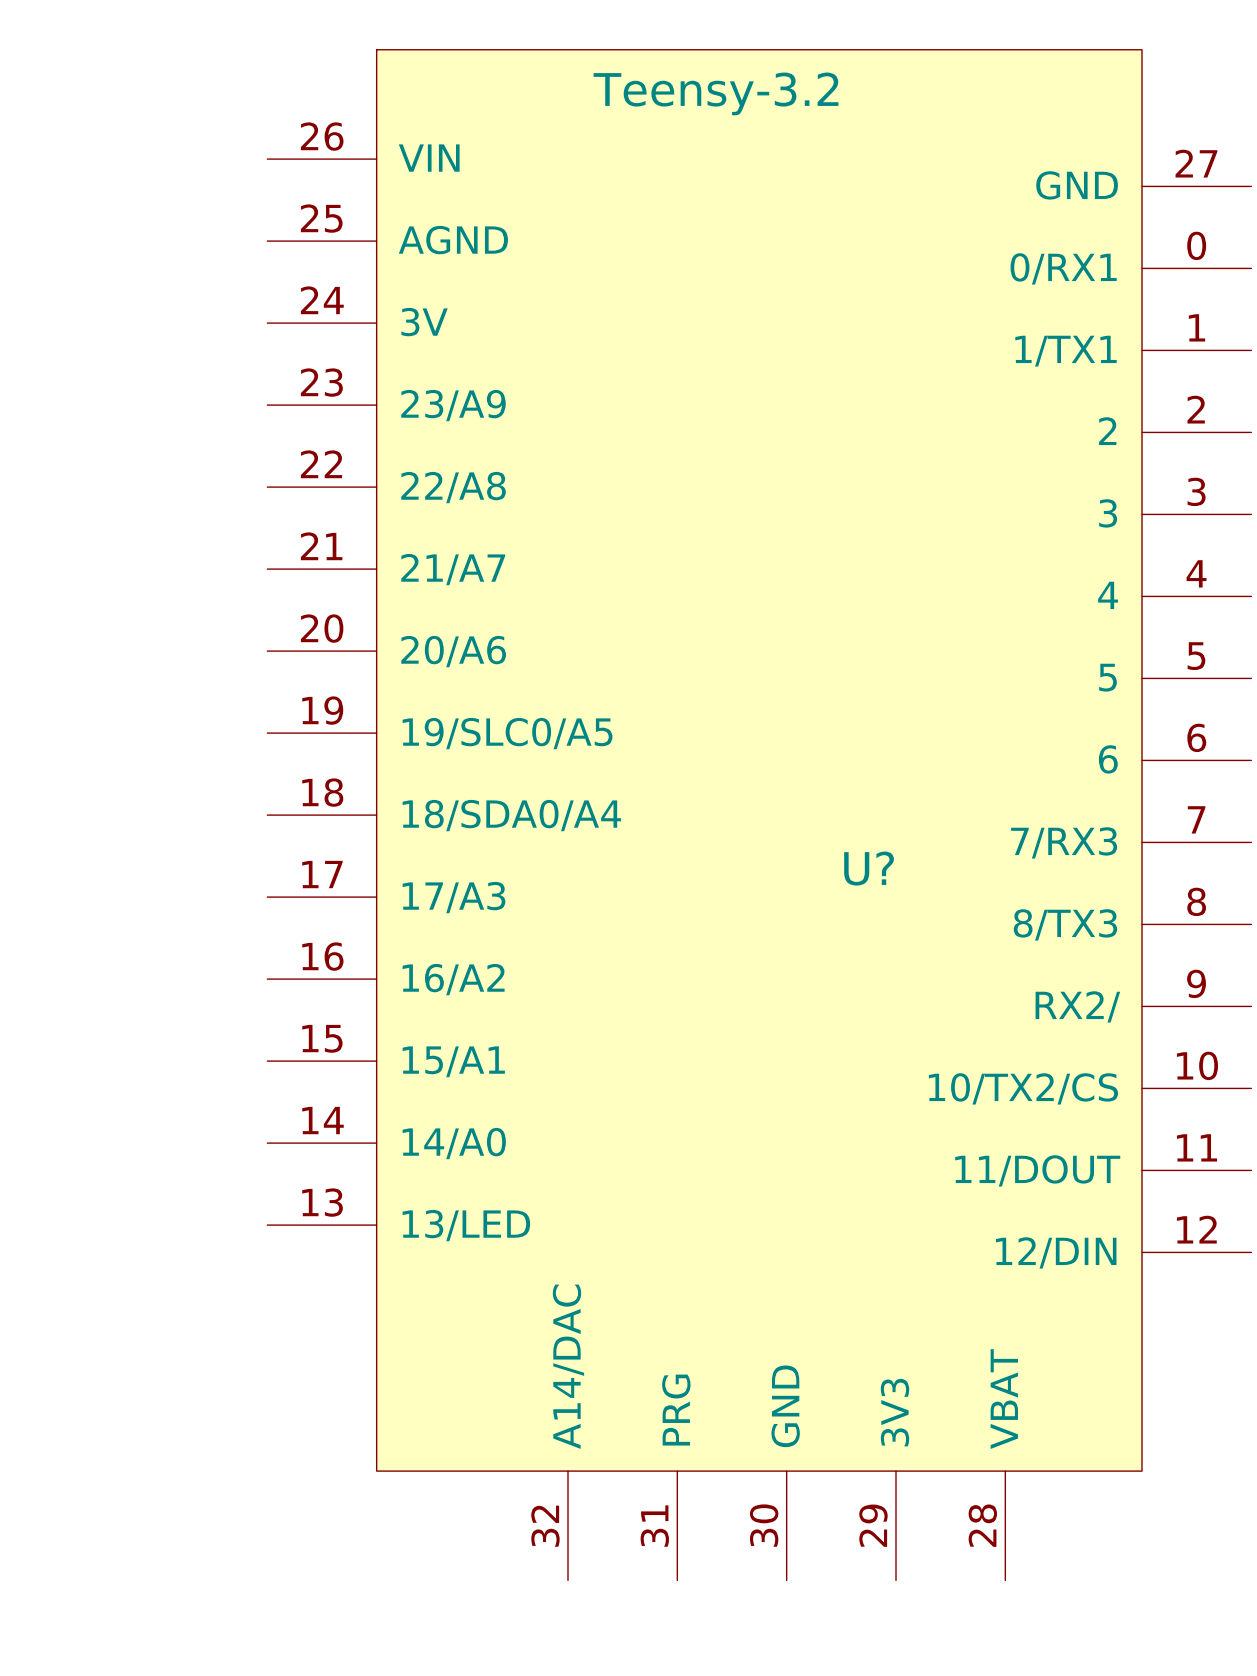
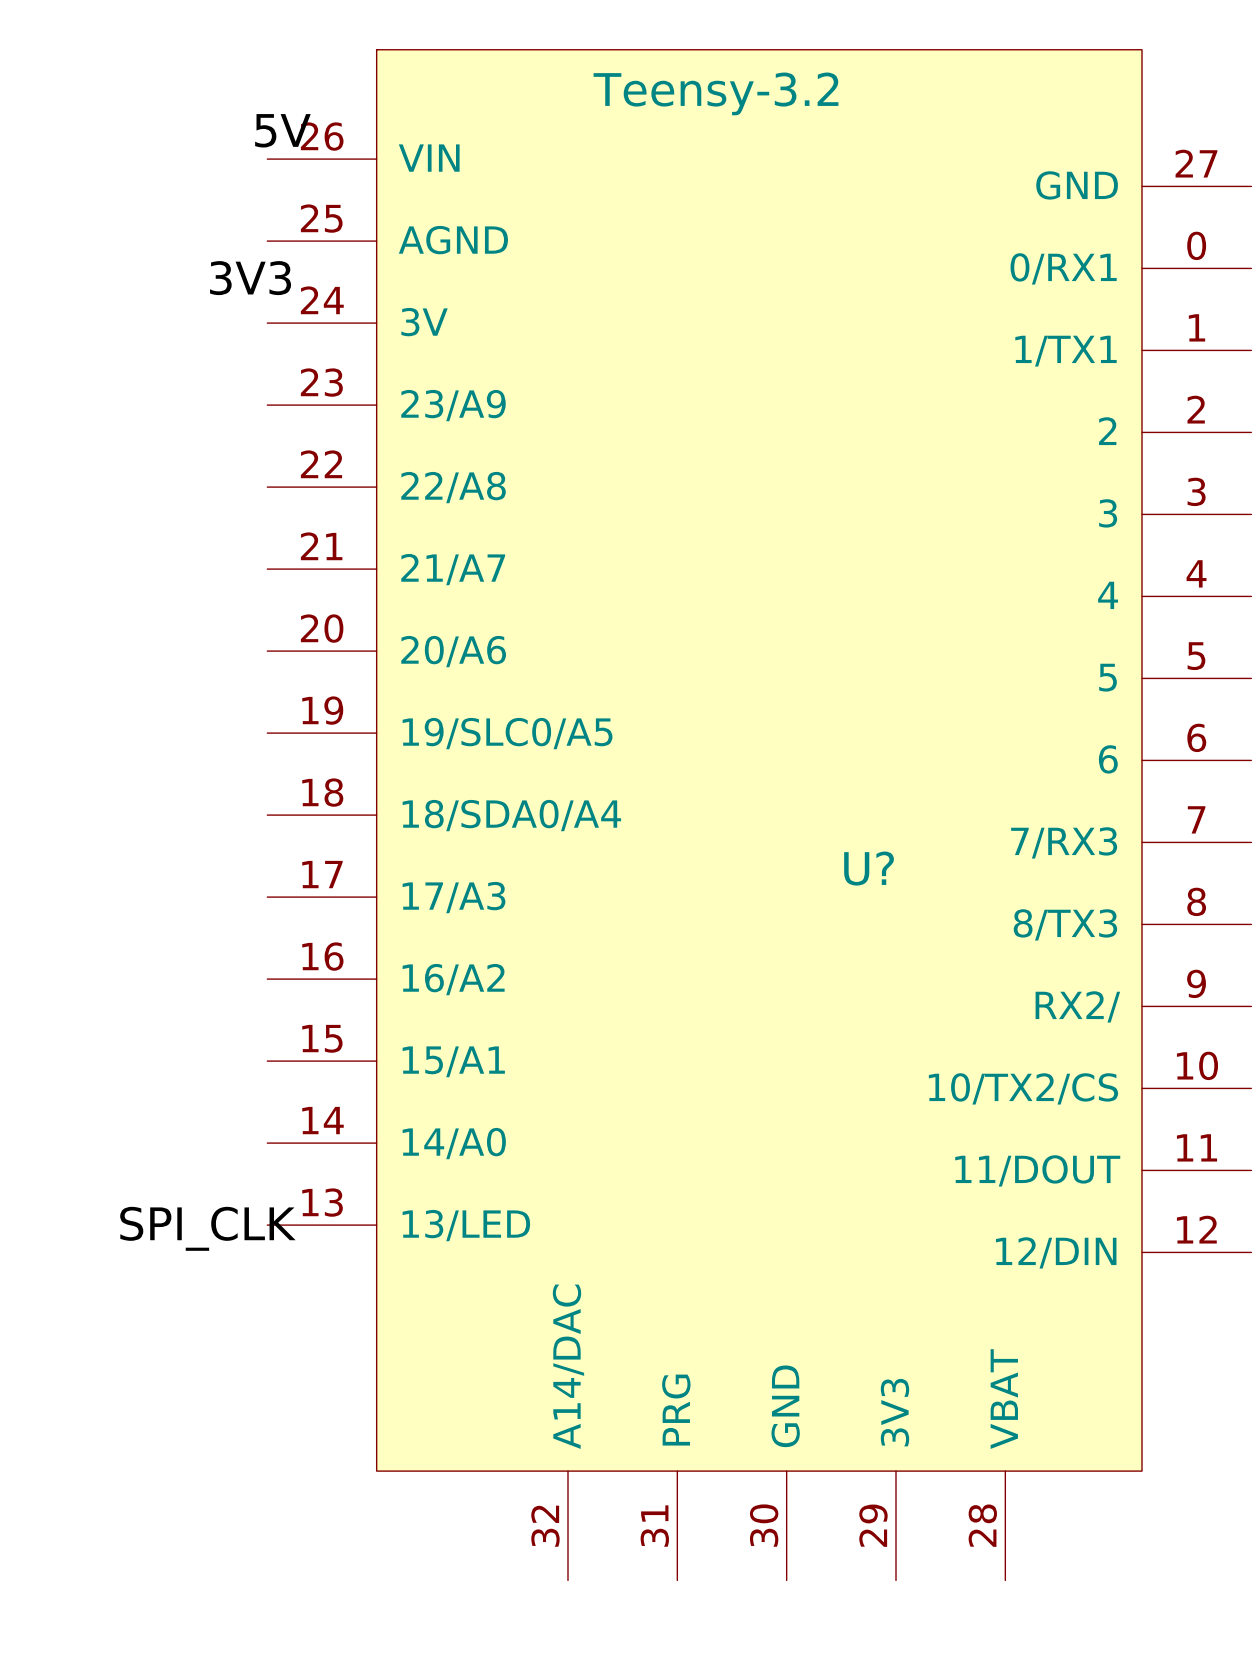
label: none -> 5V (282, 130)
label: none -> 3V3 (250, 278)
label: none -> SPI_CLK (207, 1228)

